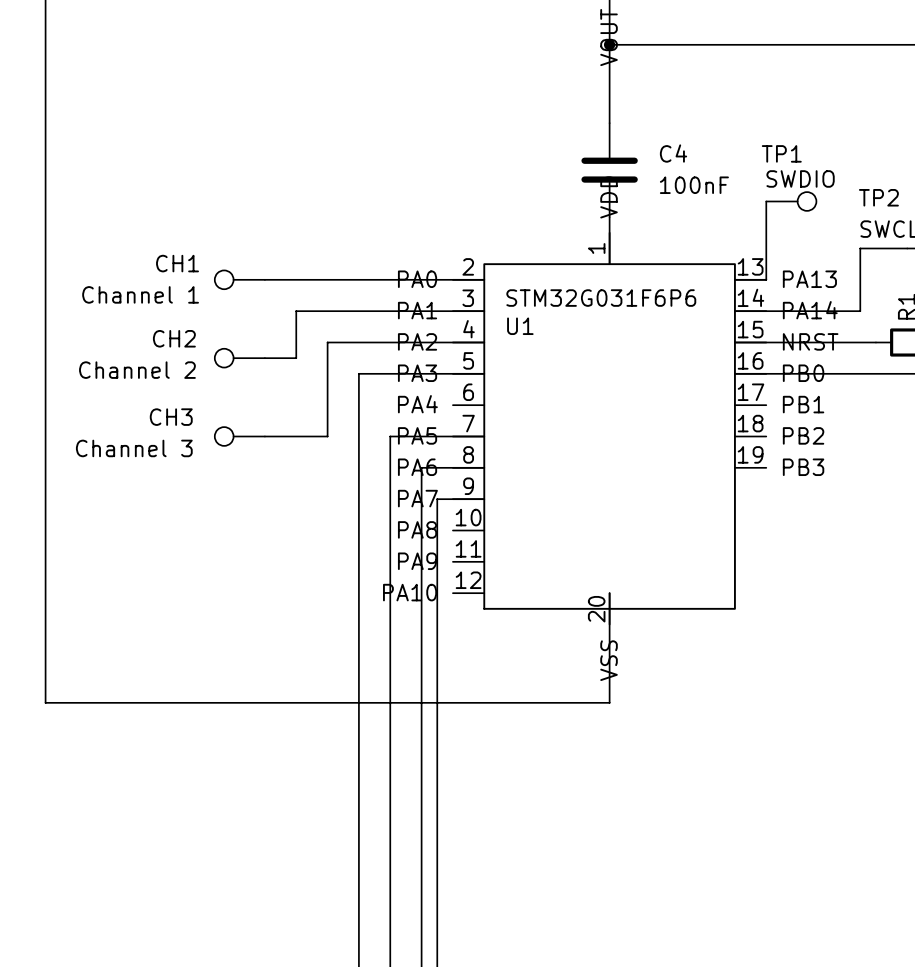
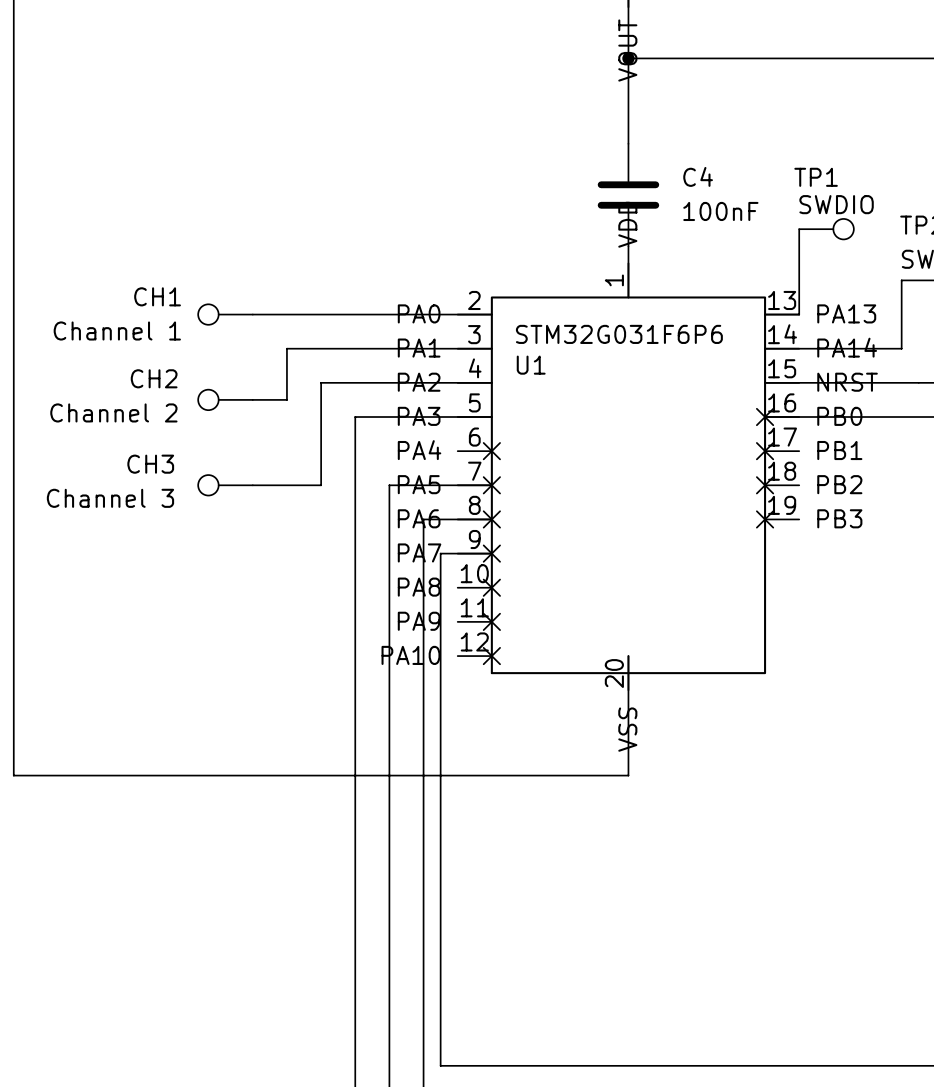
no-connect mark: none -> (765, 417)
no-connect mark: none -> (491, 451)
no-connect mark: none -> (765, 451)
no-connect mark: none -> (491, 485)
no-connect mark: none -> (765, 485)
no-connect mark: none -> (491, 519)
no-connect mark: none -> (765, 519)
no-connect mark: none -> (491, 553)
no-connect mark: none -> (491, 587)
no-connect mark: none -> (491, 621)
no-connect mark: none -> (491, 656)

